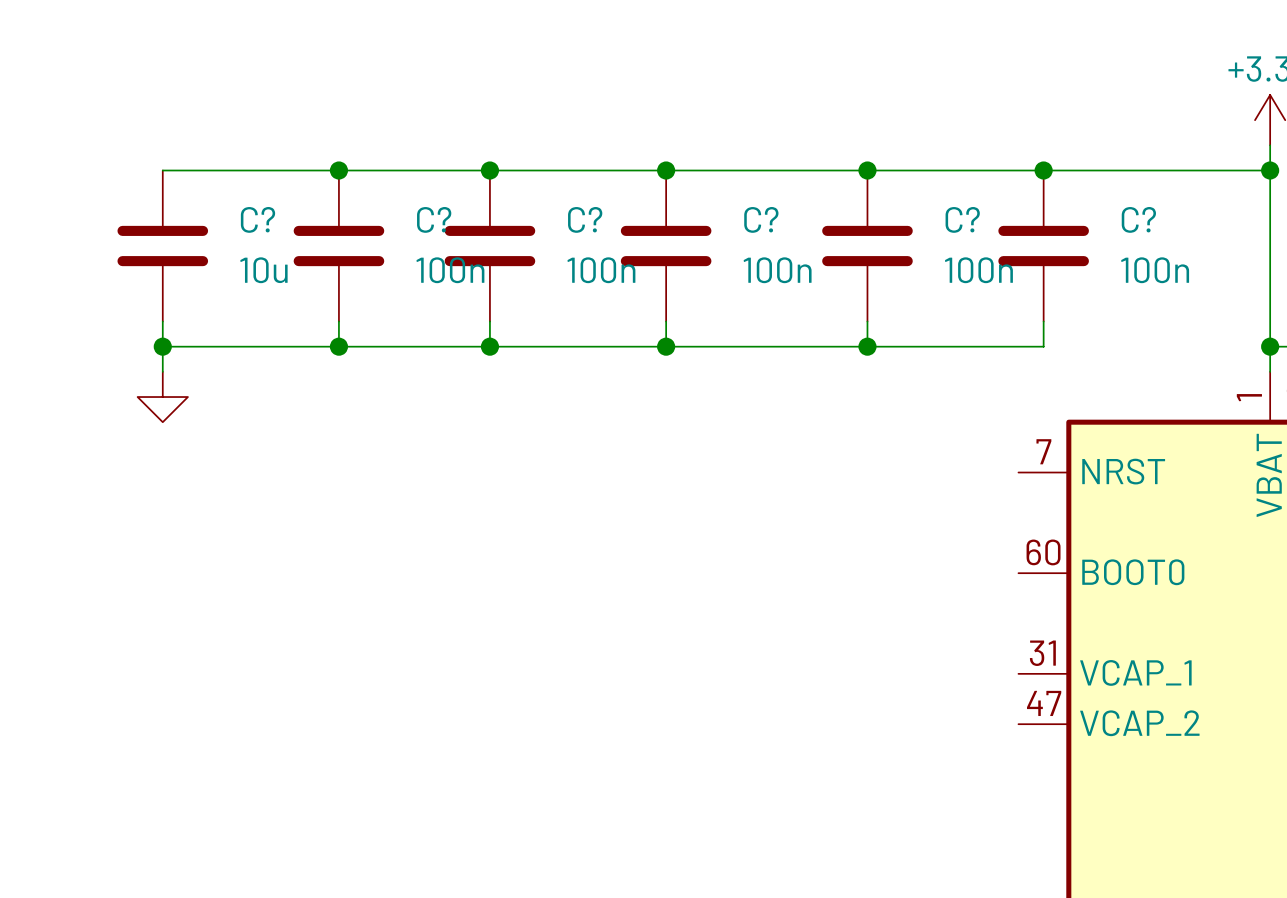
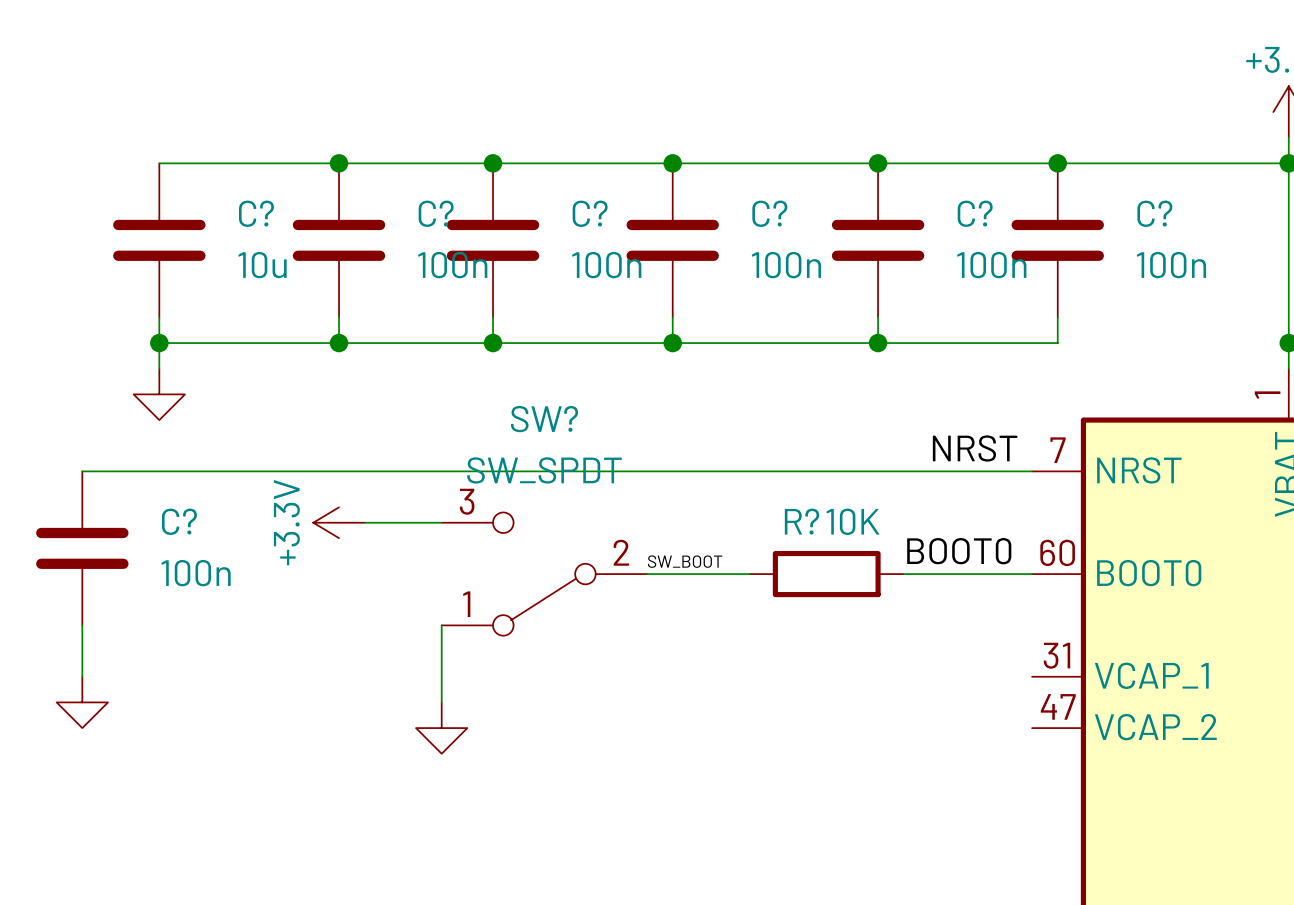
label: none -> NRST (975, 448)
wire: none -> (82, 471) (1032, 471)
power symbol: none -> +3.3V (339, 522)
wire: none -> (364, 522) (441, 522)
C?: none -> 100n (82, 548)
label: none -> BOOT0 (959, 551)
label: none -> SW_BOOT (685, 561)
SW?: none -> SW_SPDT (544, 574)
wire: none -> (647, 574) (749, 574)
R?: none -> 10K (826, 574)
wire: none -> (903, 574) (1032, 574)
wire: none -> (82, 625) (82, 676)
wire: none -> (441, 625) (441, 702)
power symbol: none -> (82, 702)
power symbol: none -> (441, 728)

